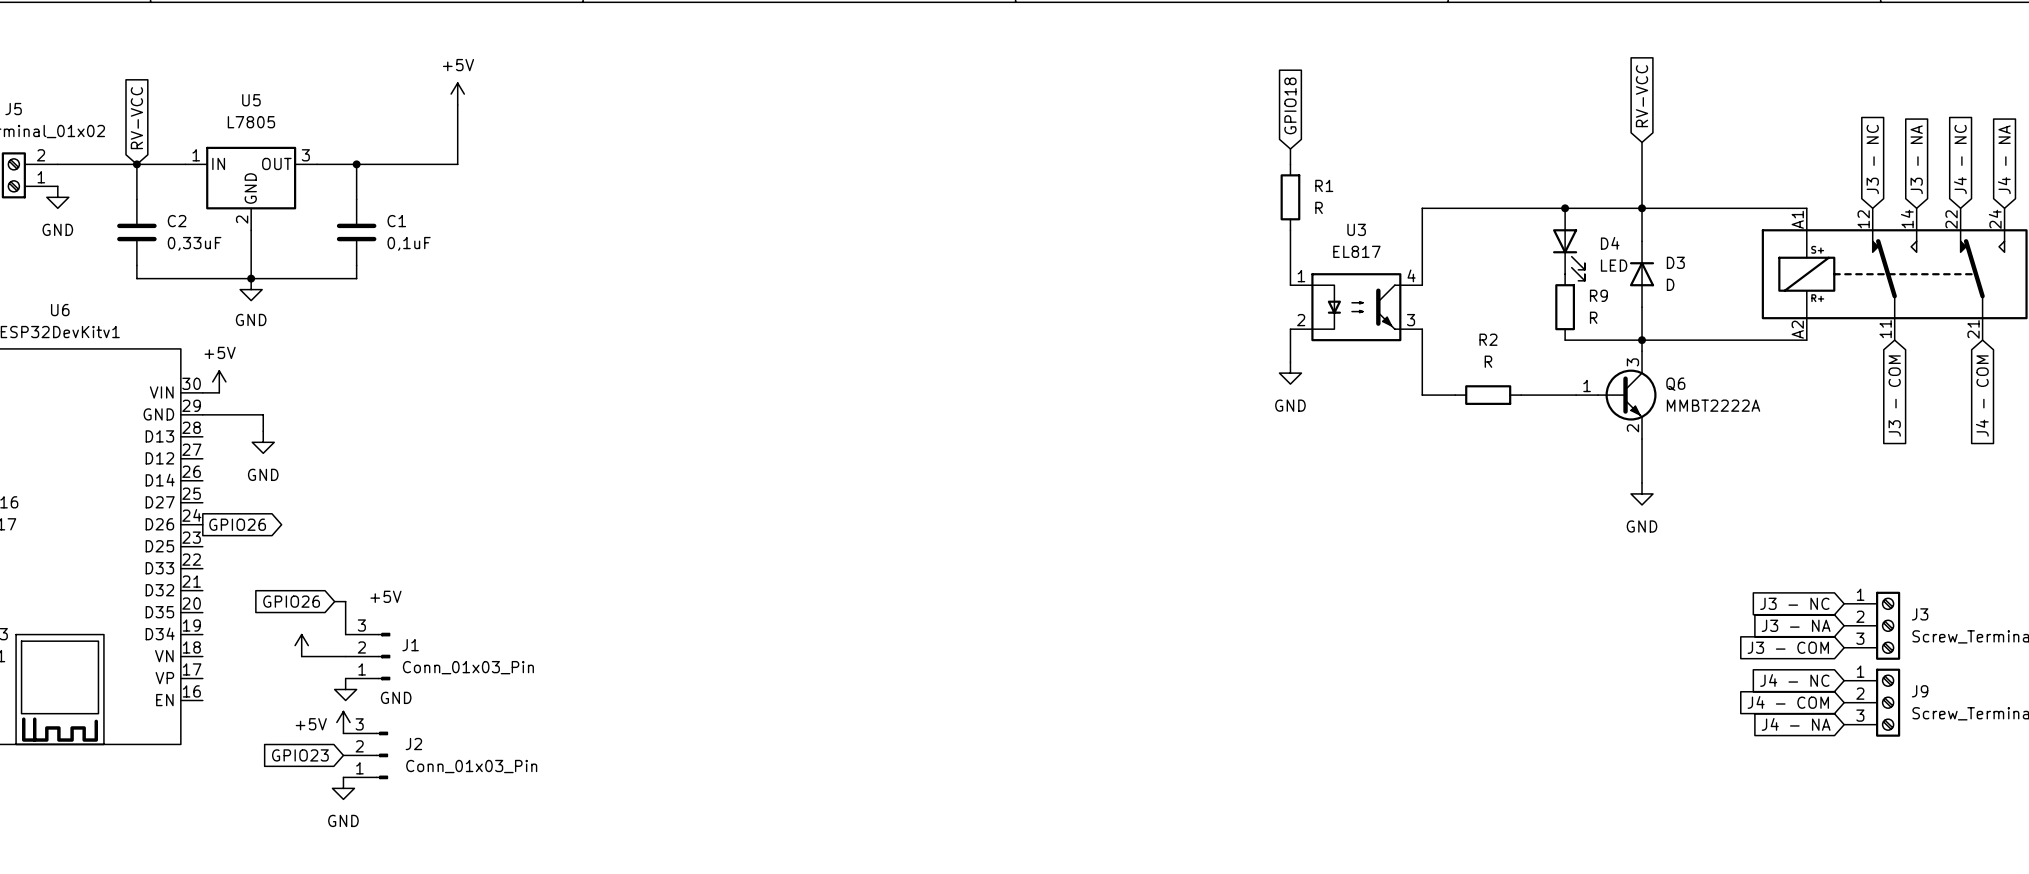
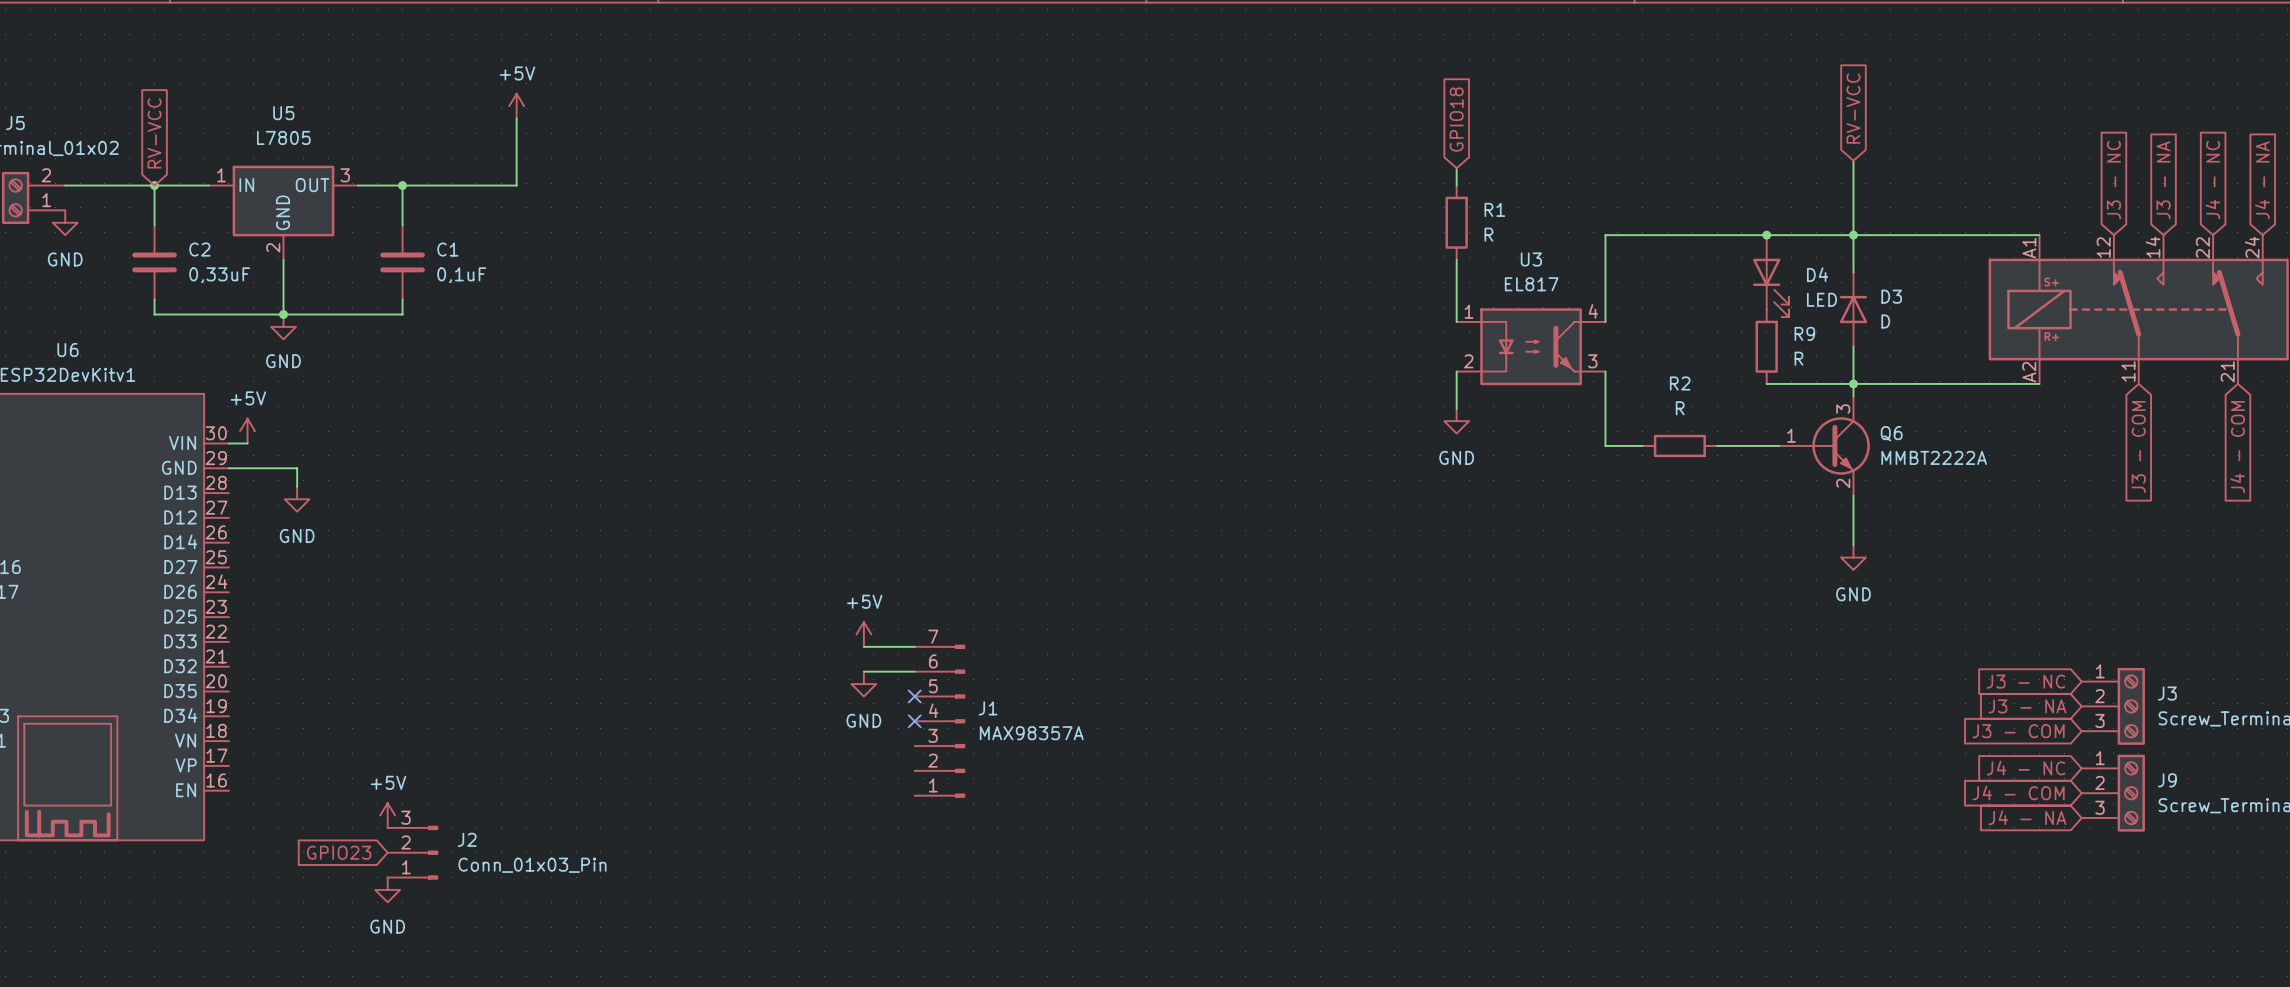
global label: GPIO26 (237, 524) -> none
power symbol: none -> +5V (863, 634)
wire: none -> (863, 646) (914, 646)
wire: none -> (863, 671) (914, 671)
global label: GPIO26 (291, 601) -> none
wire: (334, 601) (345, 601) (345, 634) -> none
power symbol: none -> GND (863, 684)
no-connect mark: none -> (914, 696)
J1 symbol: [345, 632, 391, 681] -> [914, 644, 966, 798]
no-connect mark: none -> (914, 721)
power symbol: +5V (301, 645) -> none
wire: (301, 656) (345, 656) -> none
J1 value: Conn_01x03_Pin (468, 667) -> MAX98357A (1031, 733)
power symbol: GND (345, 689) -> none
power symbol text position: +5V (311, 724) -> +5V (388, 782)

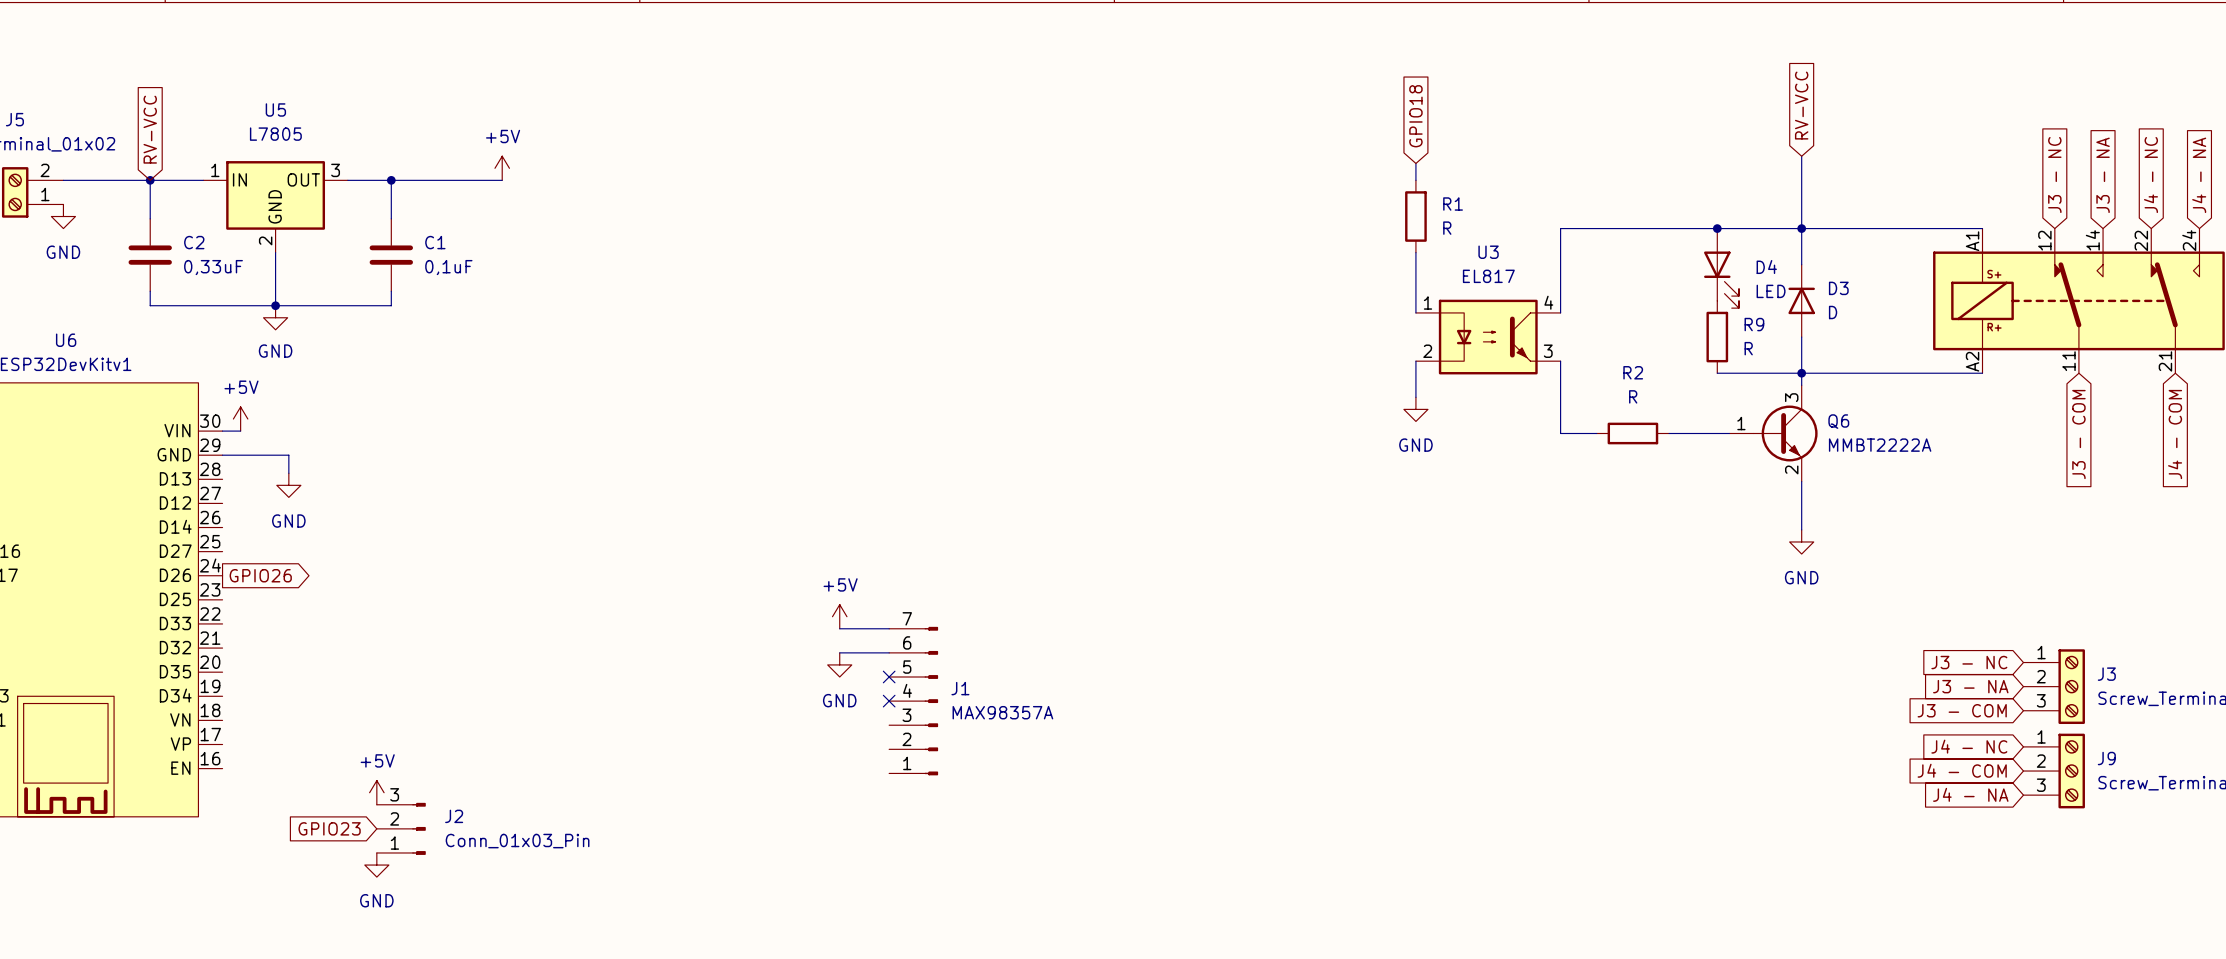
power symbol position: +5V (516, 106) -> +5V (502, 168)
wire: (516, 118) (516, 185) -> none
global label: none -> GPIO26 (260, 575)

